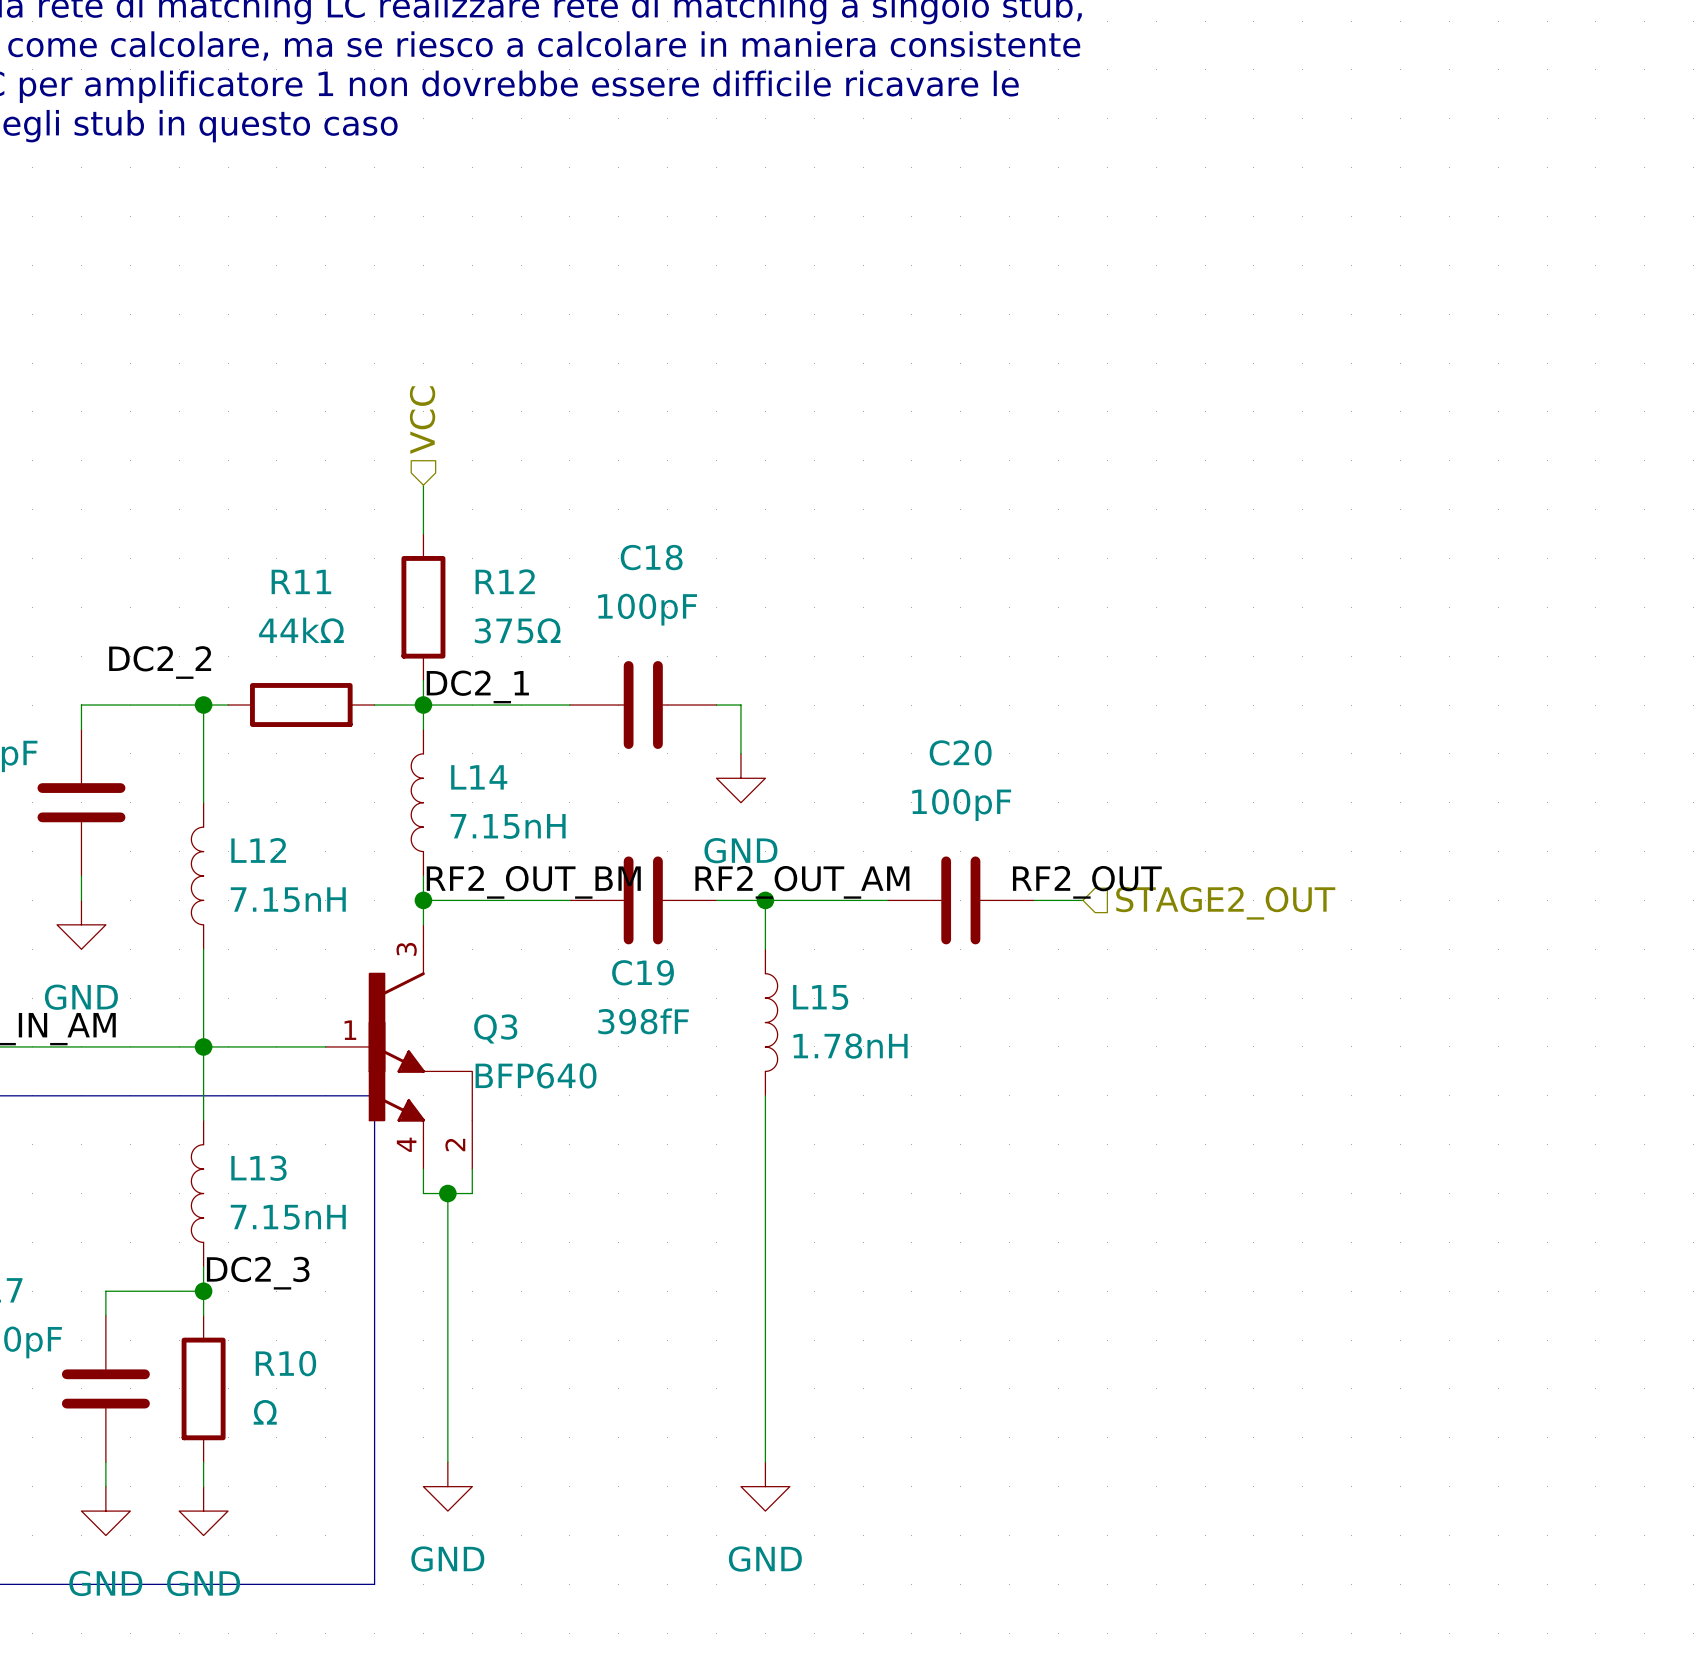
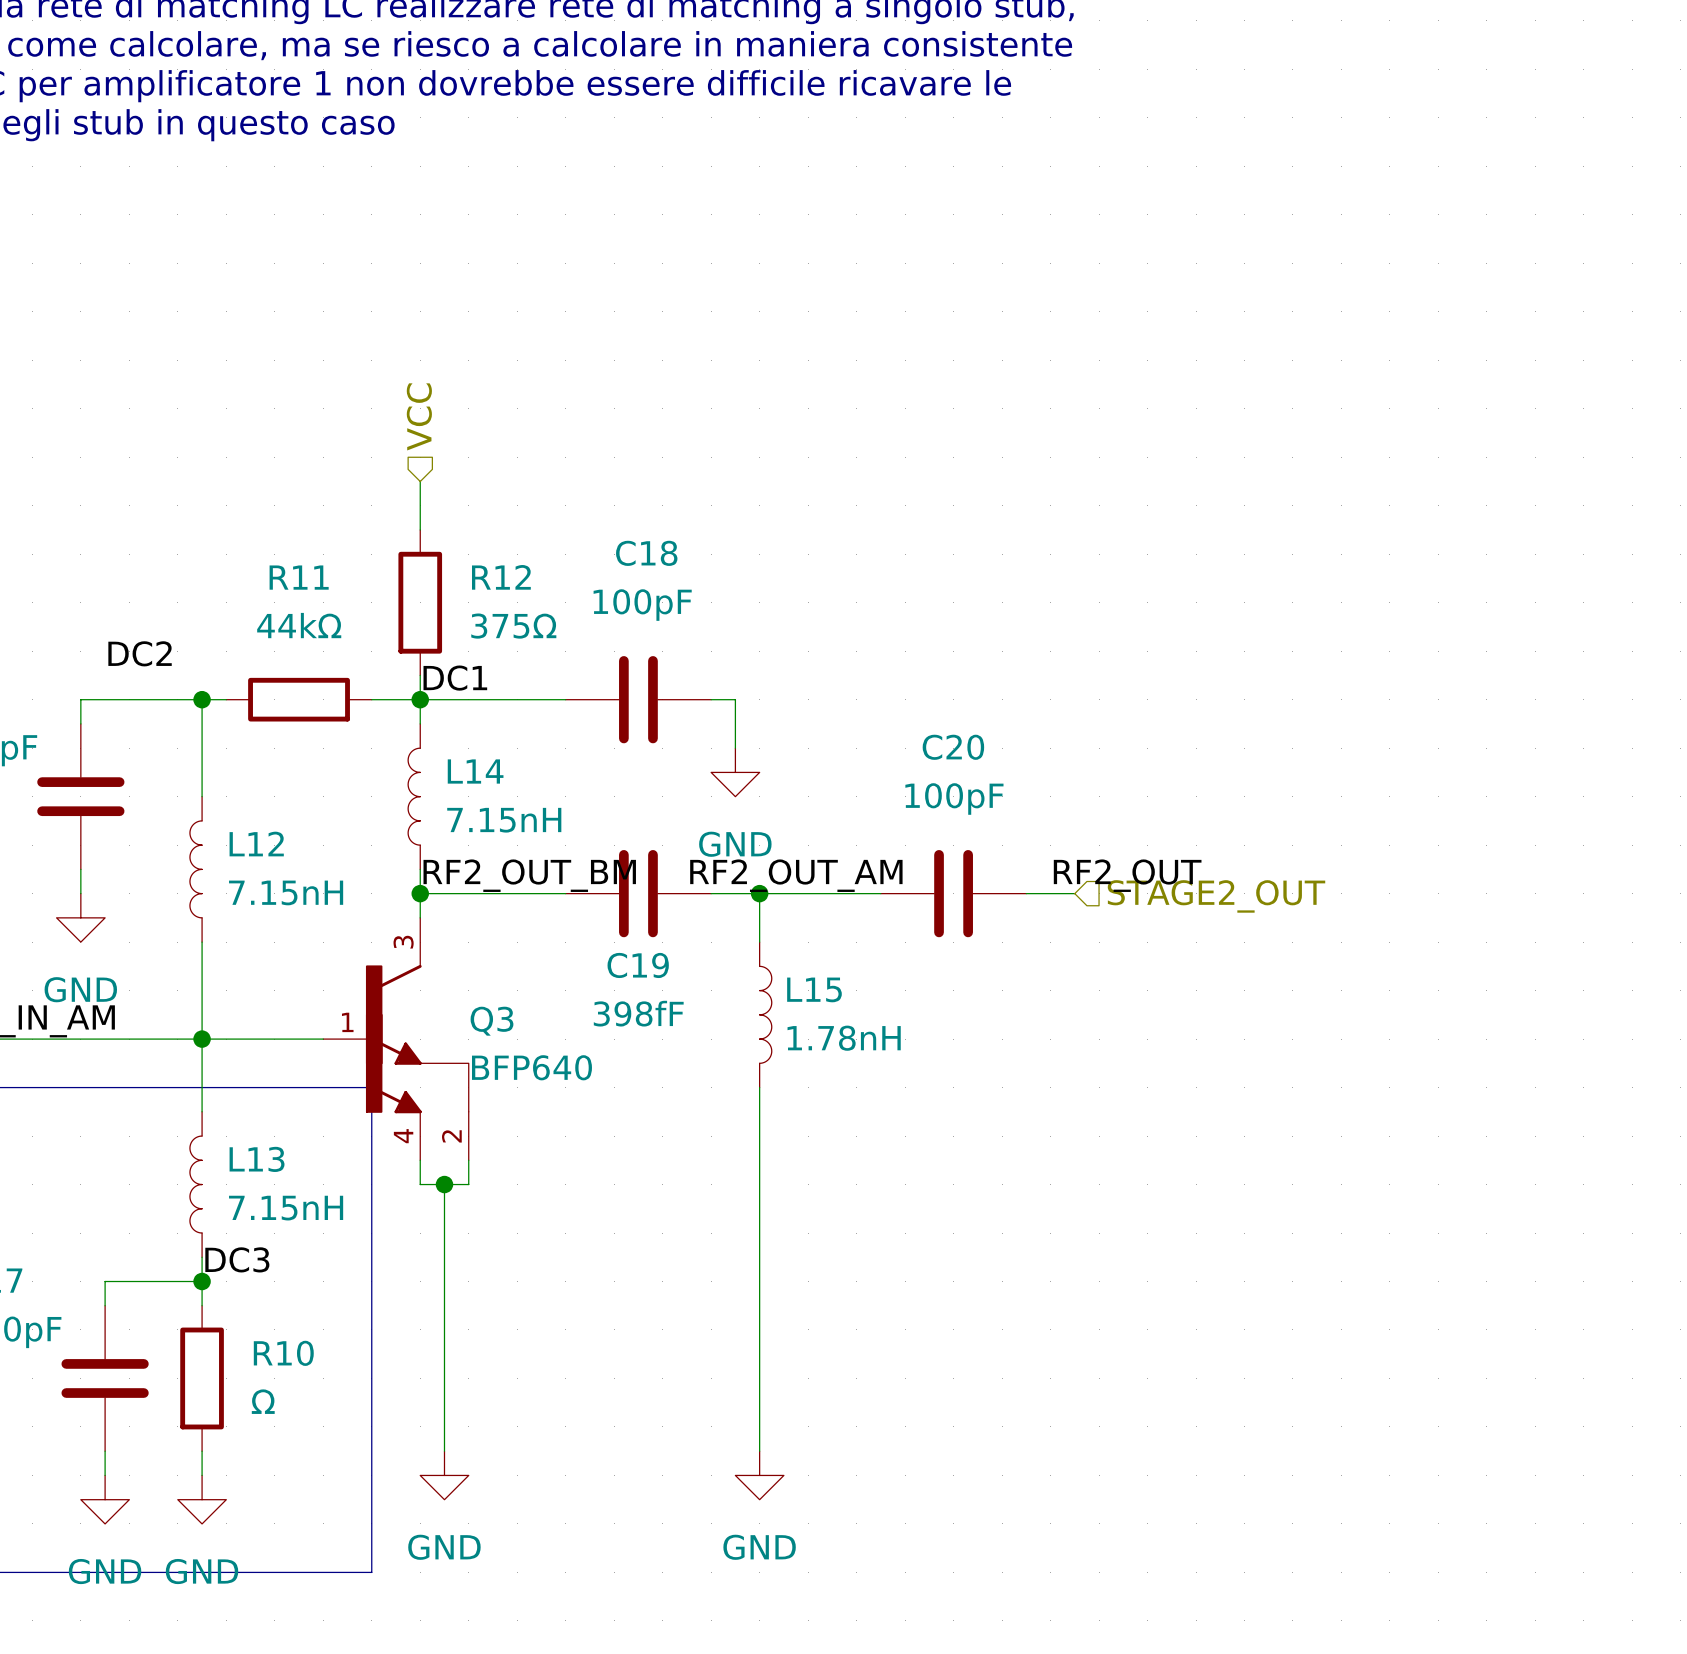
label: DC2_2 (160, 662) -> DC2 (140, 653)
label: DC2_1 (477, 686) -> DC1 (455, 678)
label position: RF2_OUT (1087, 882) -> RF2_OUT (1127, 875)
label: DC2_3 (258, 1273) -> DC3 (237, 1259)

